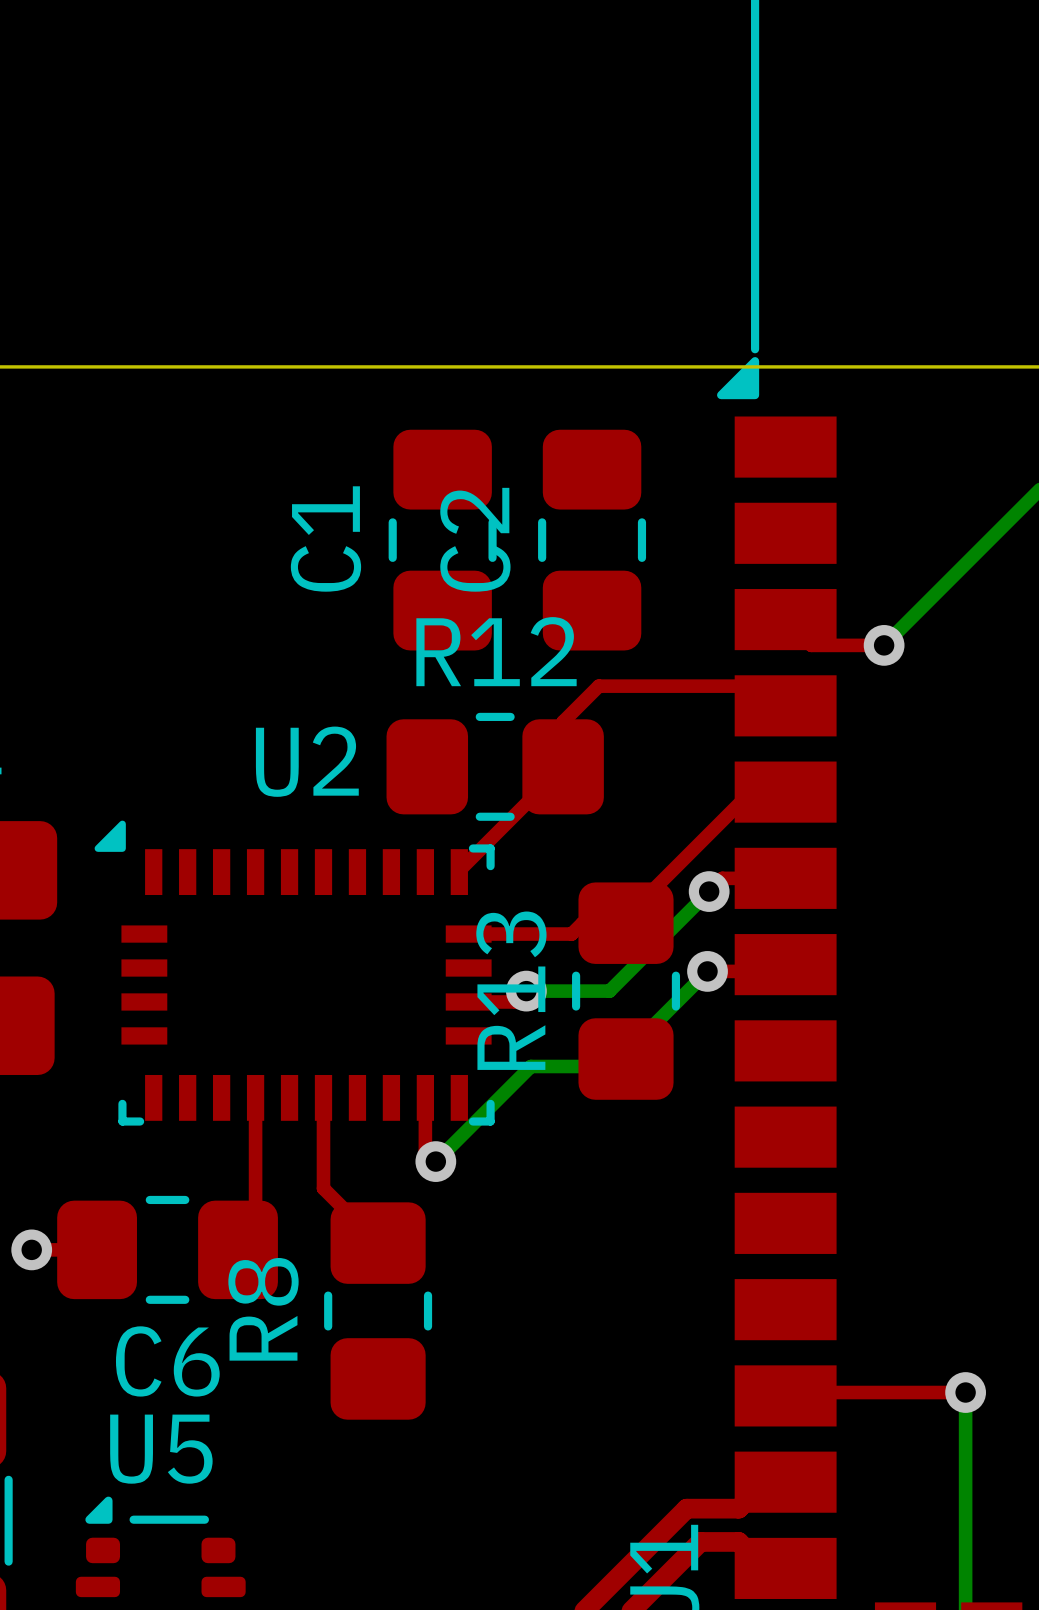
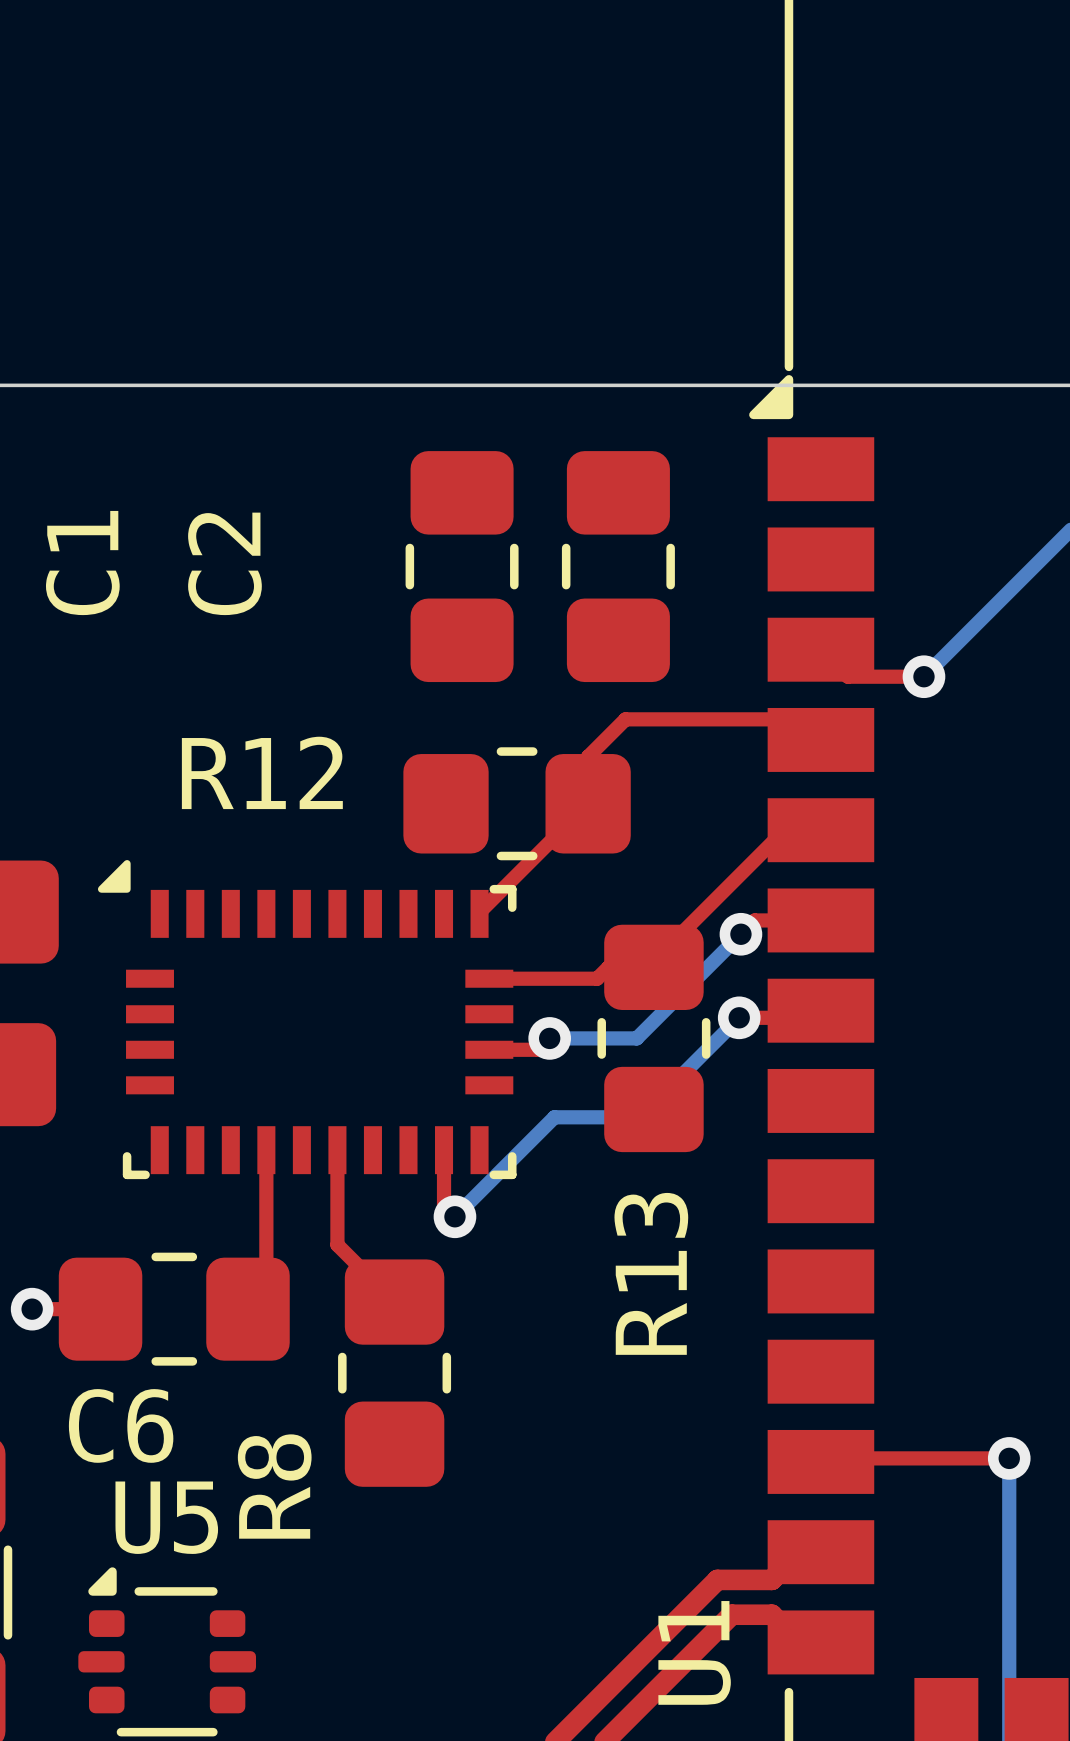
C1 name position: C1 (325, 538) -> C1 (82, 563)
C2 name position: C2 (475, 539) -> C2 (224, 563)
R12 name position: R12 (496, 651) -> R12 (262, 772)
U2 name: U2 (307, 761) -> none
R13 name position: R13 (511, 990) -> R13 (651, 1273)
R8 name position: R8 (263, 1309) -> R8 (274, 1486)
C6 name position: C6 (167, 1361) -> C6 (121, 1425)

